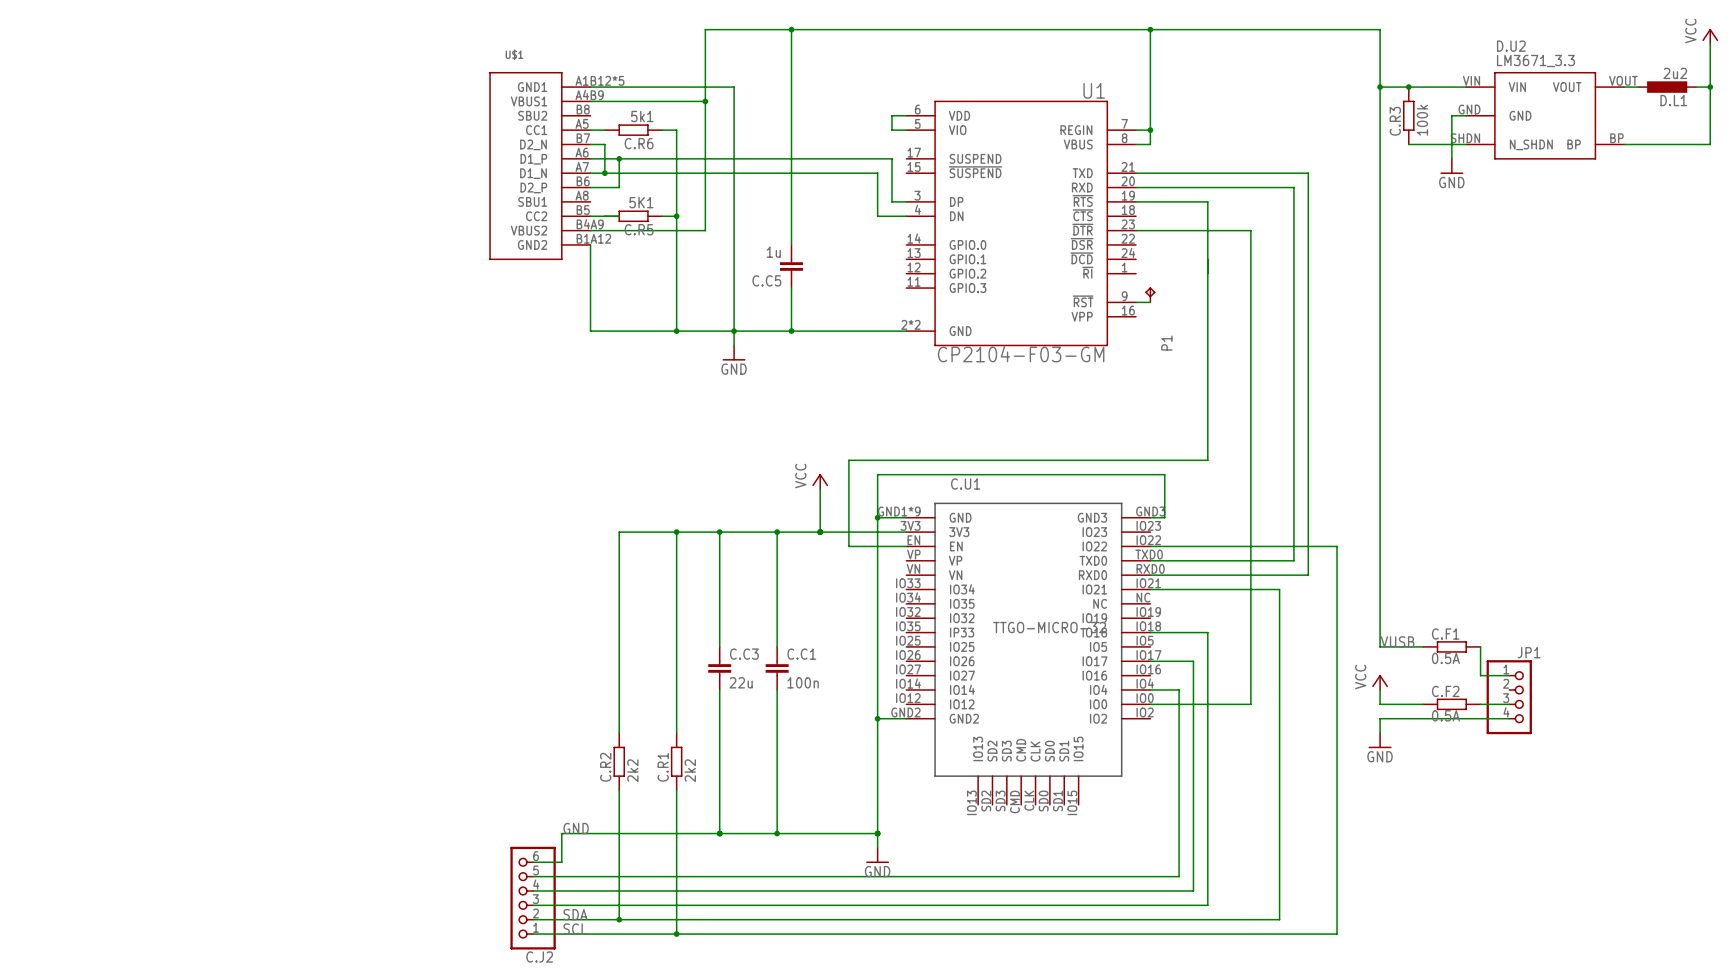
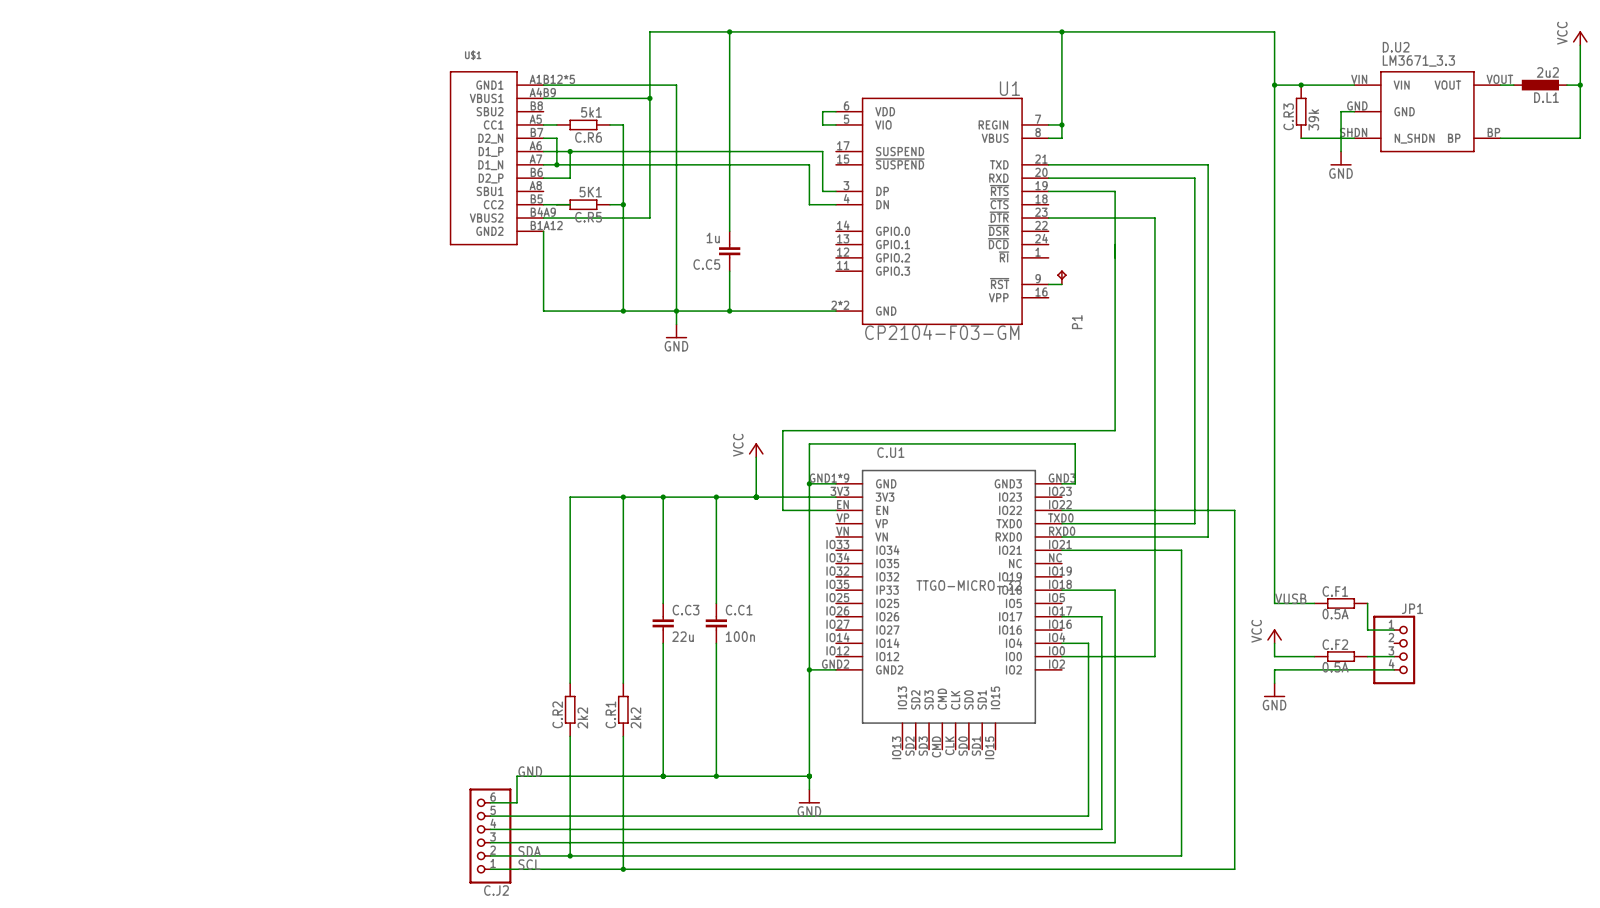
C.R3 value: 100k (1422, 120) -> 39k (1313, 119)

